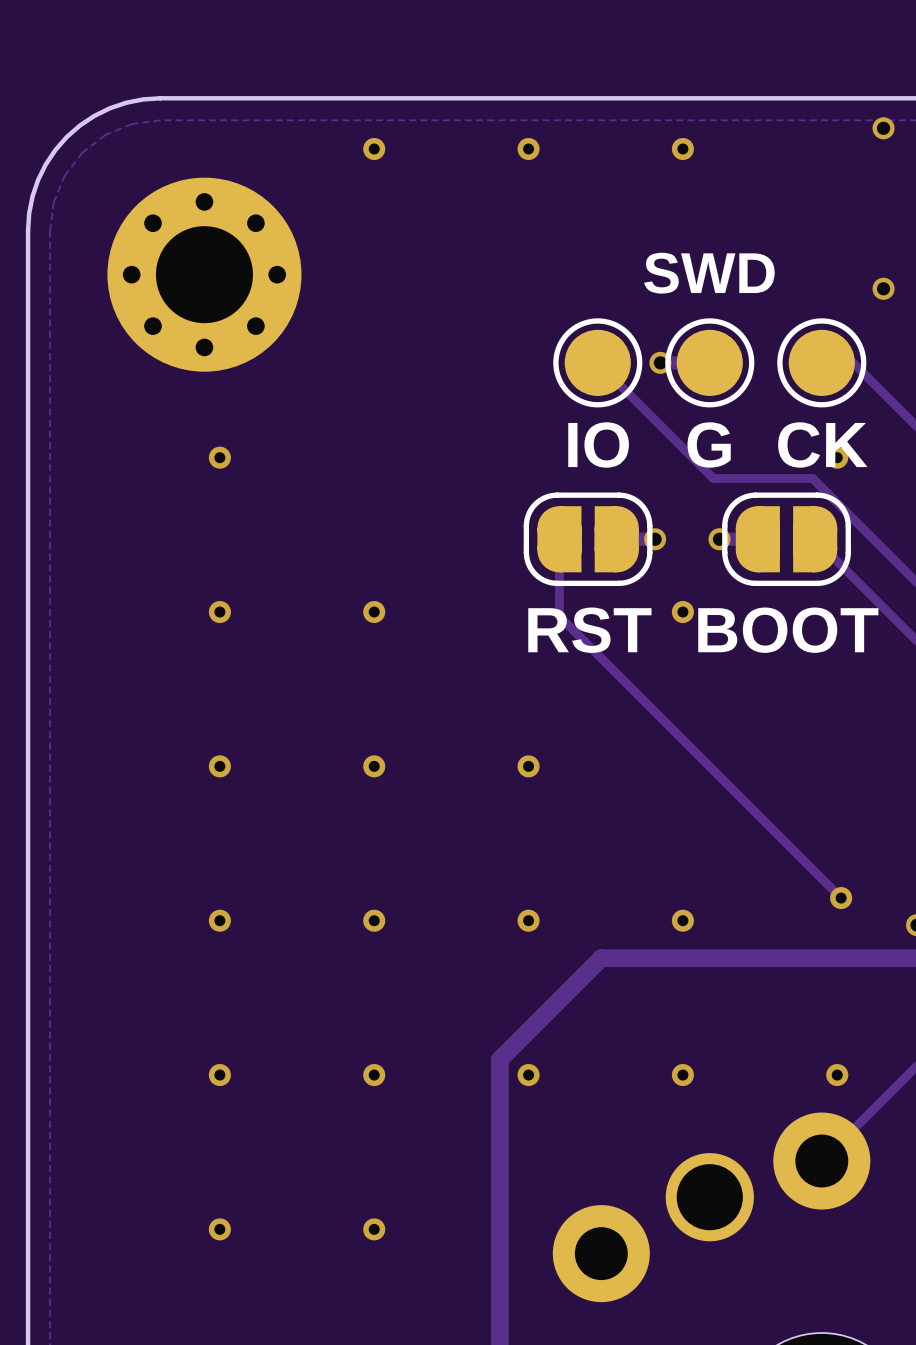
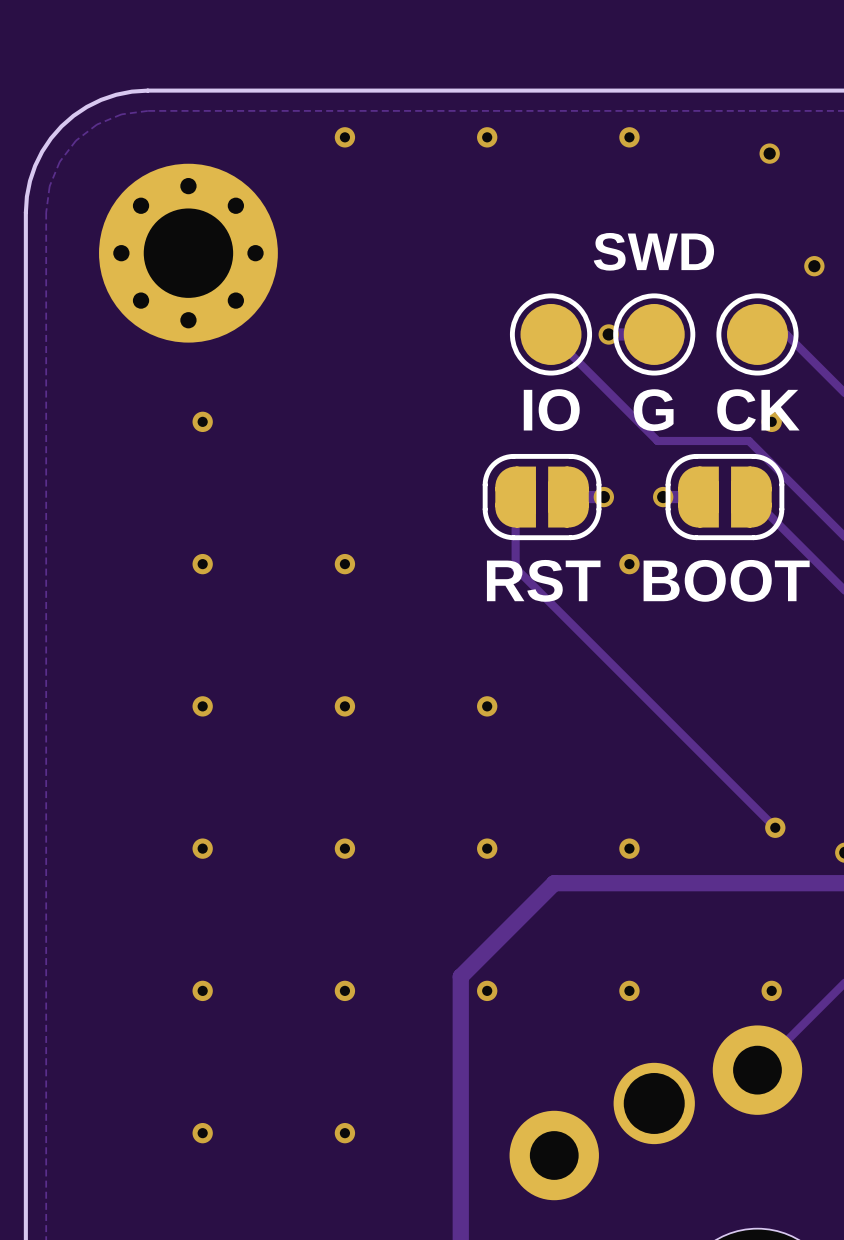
via: (883, 128) -> none
via: none -> (769, 153)

